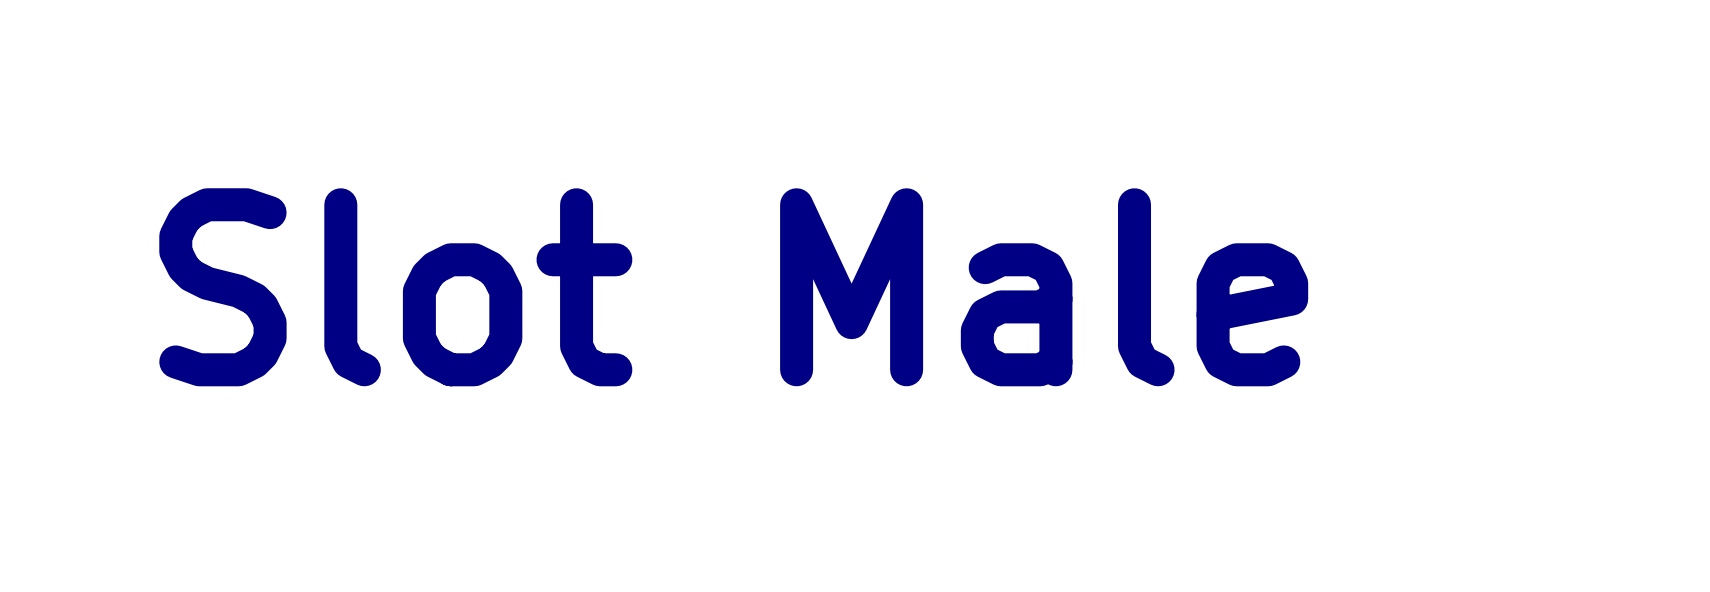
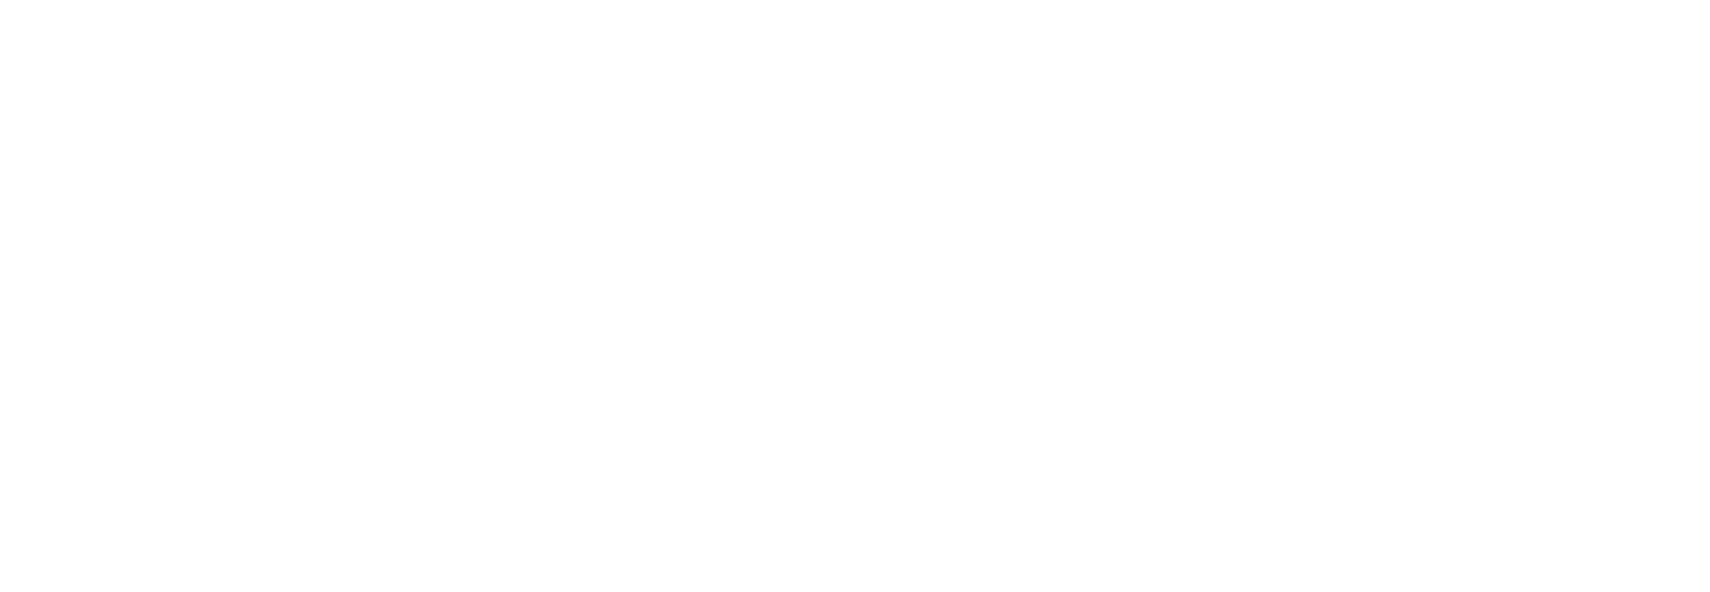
text: Slot Male (733, 287) -> none

